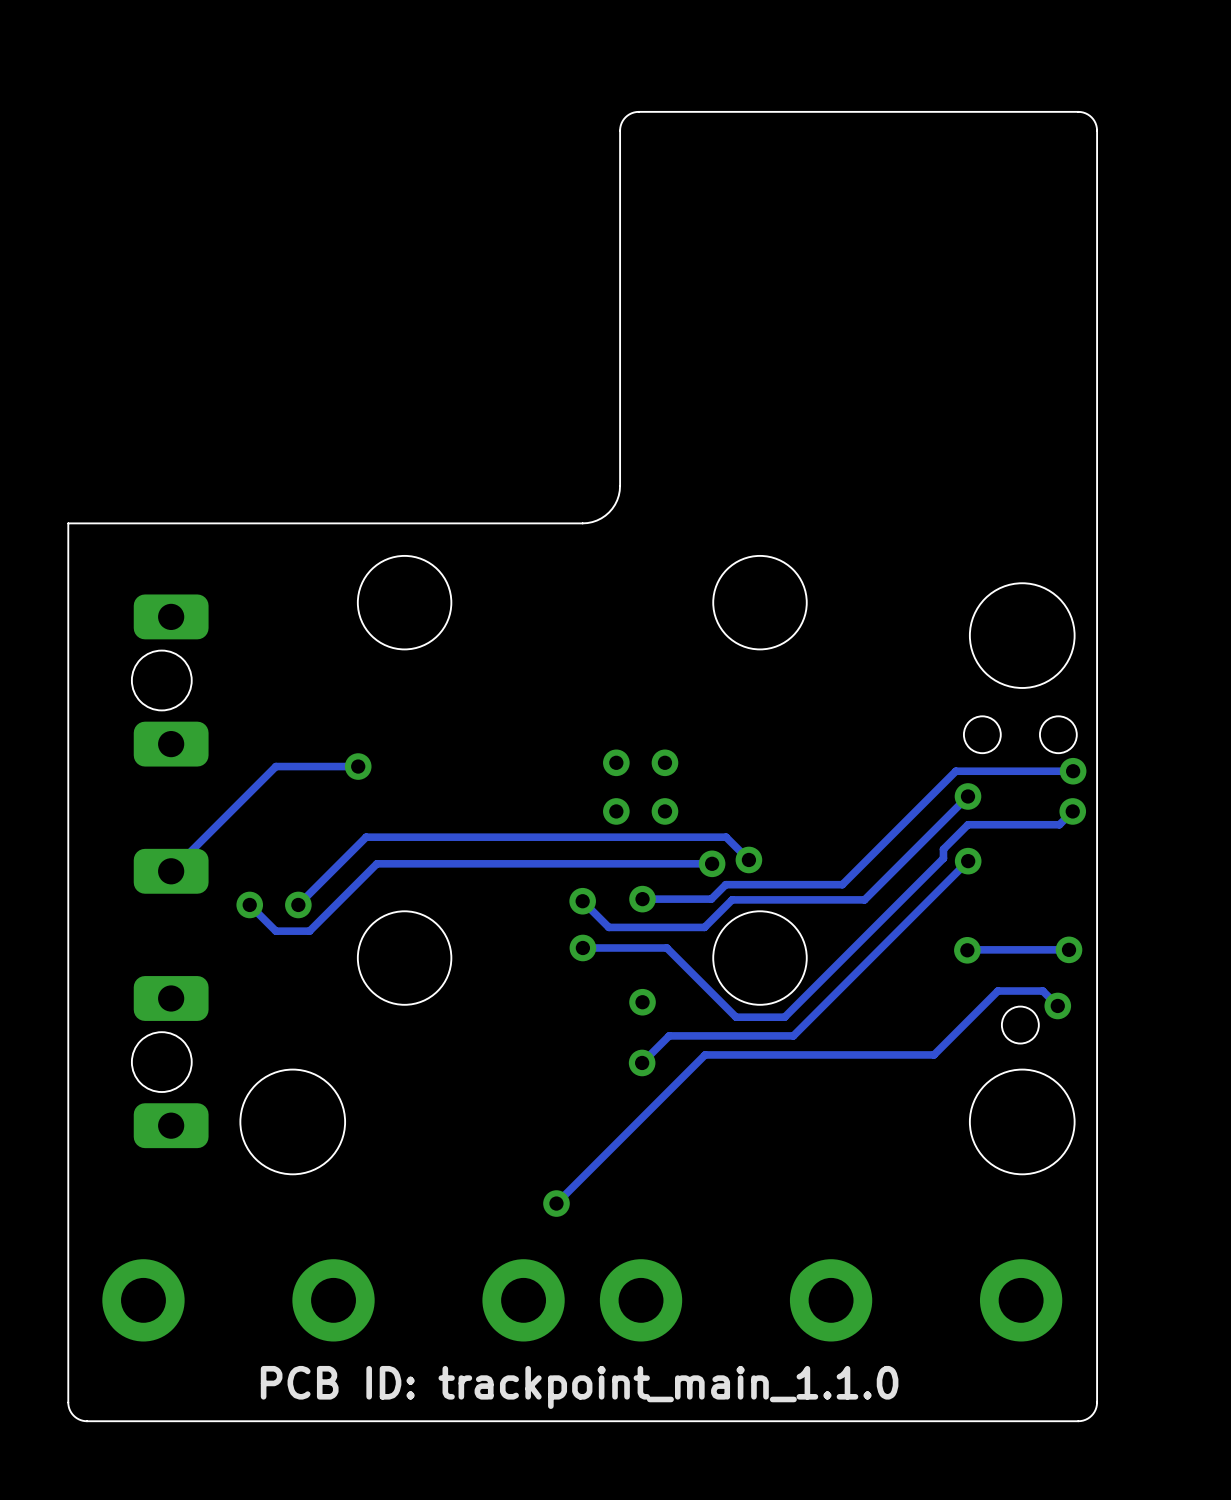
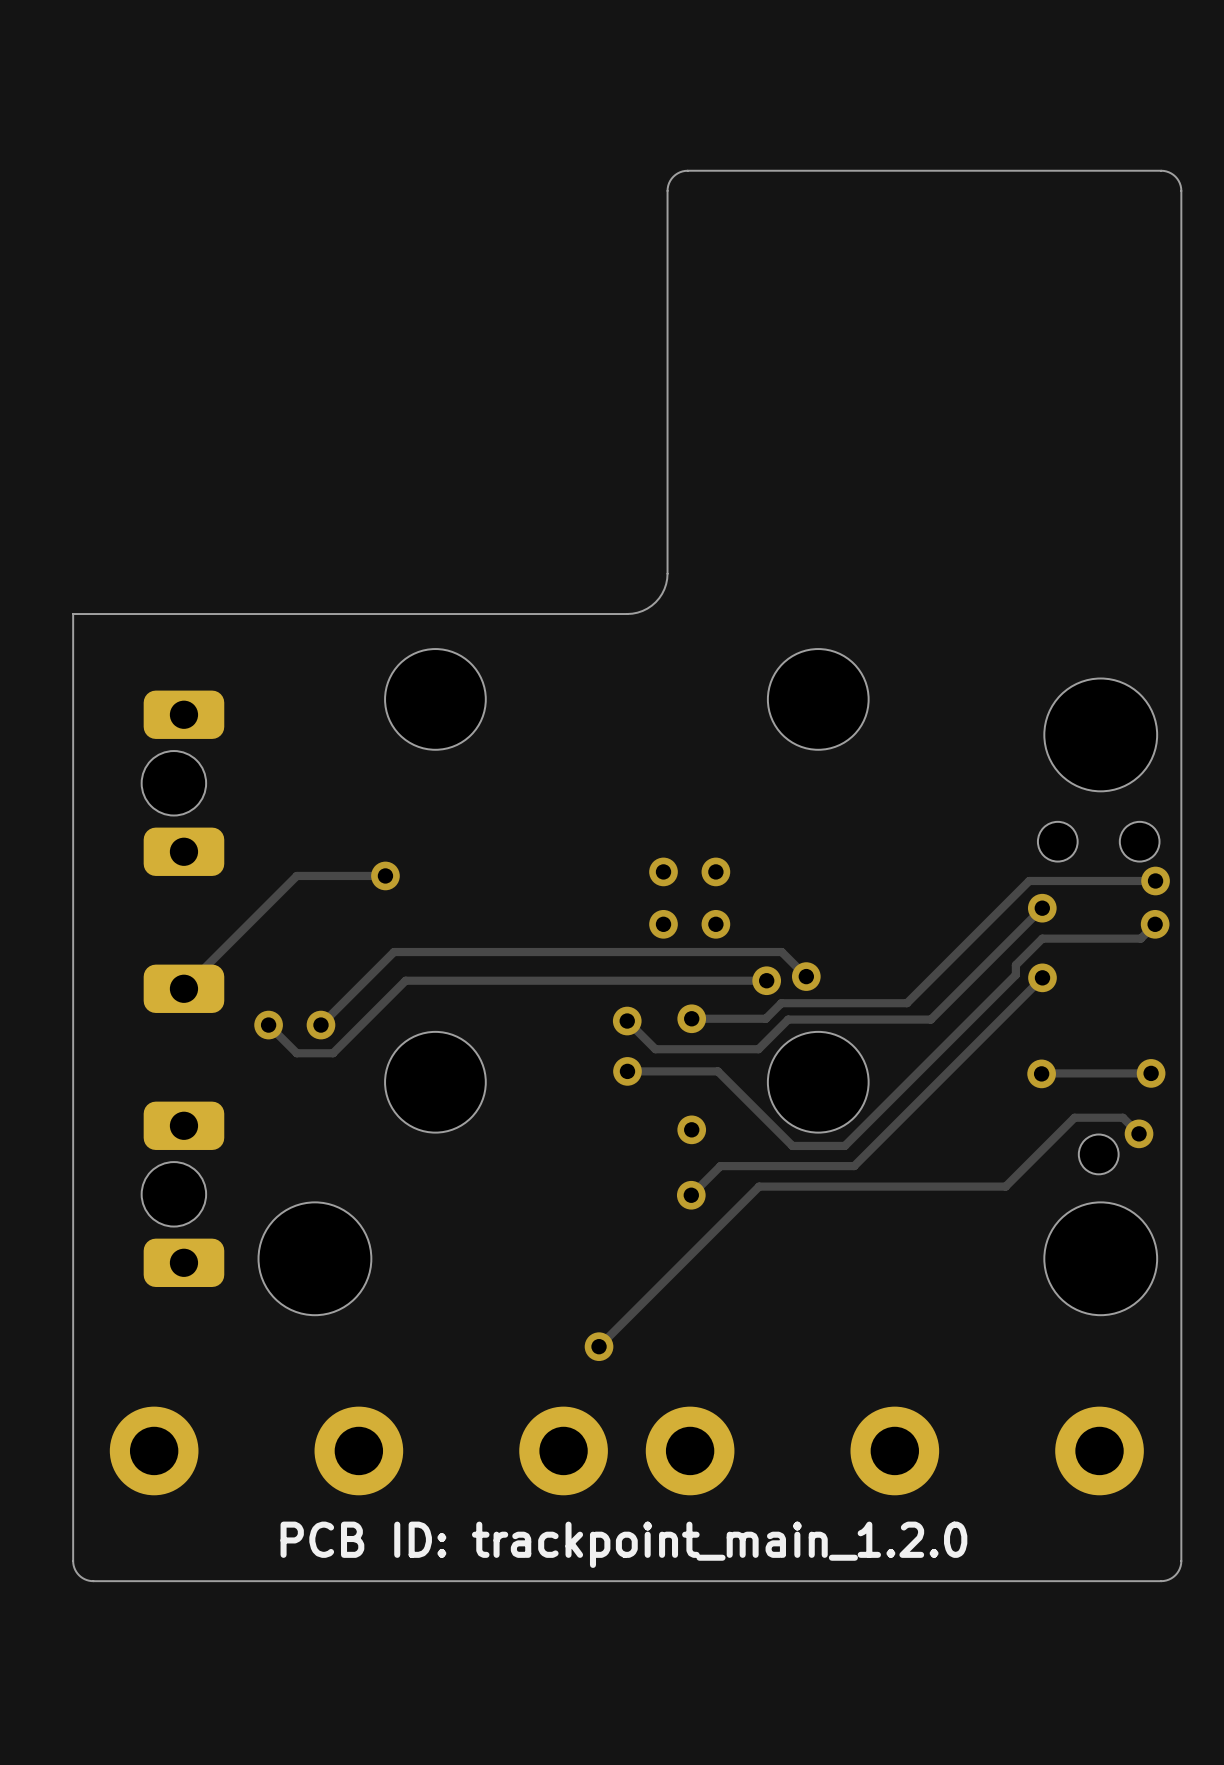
text: PCB ID: trackpoint_main_1.1.0 (579, 1387) -> PCB ID: trackpoint_main_1.2.0 (623, 1544)

